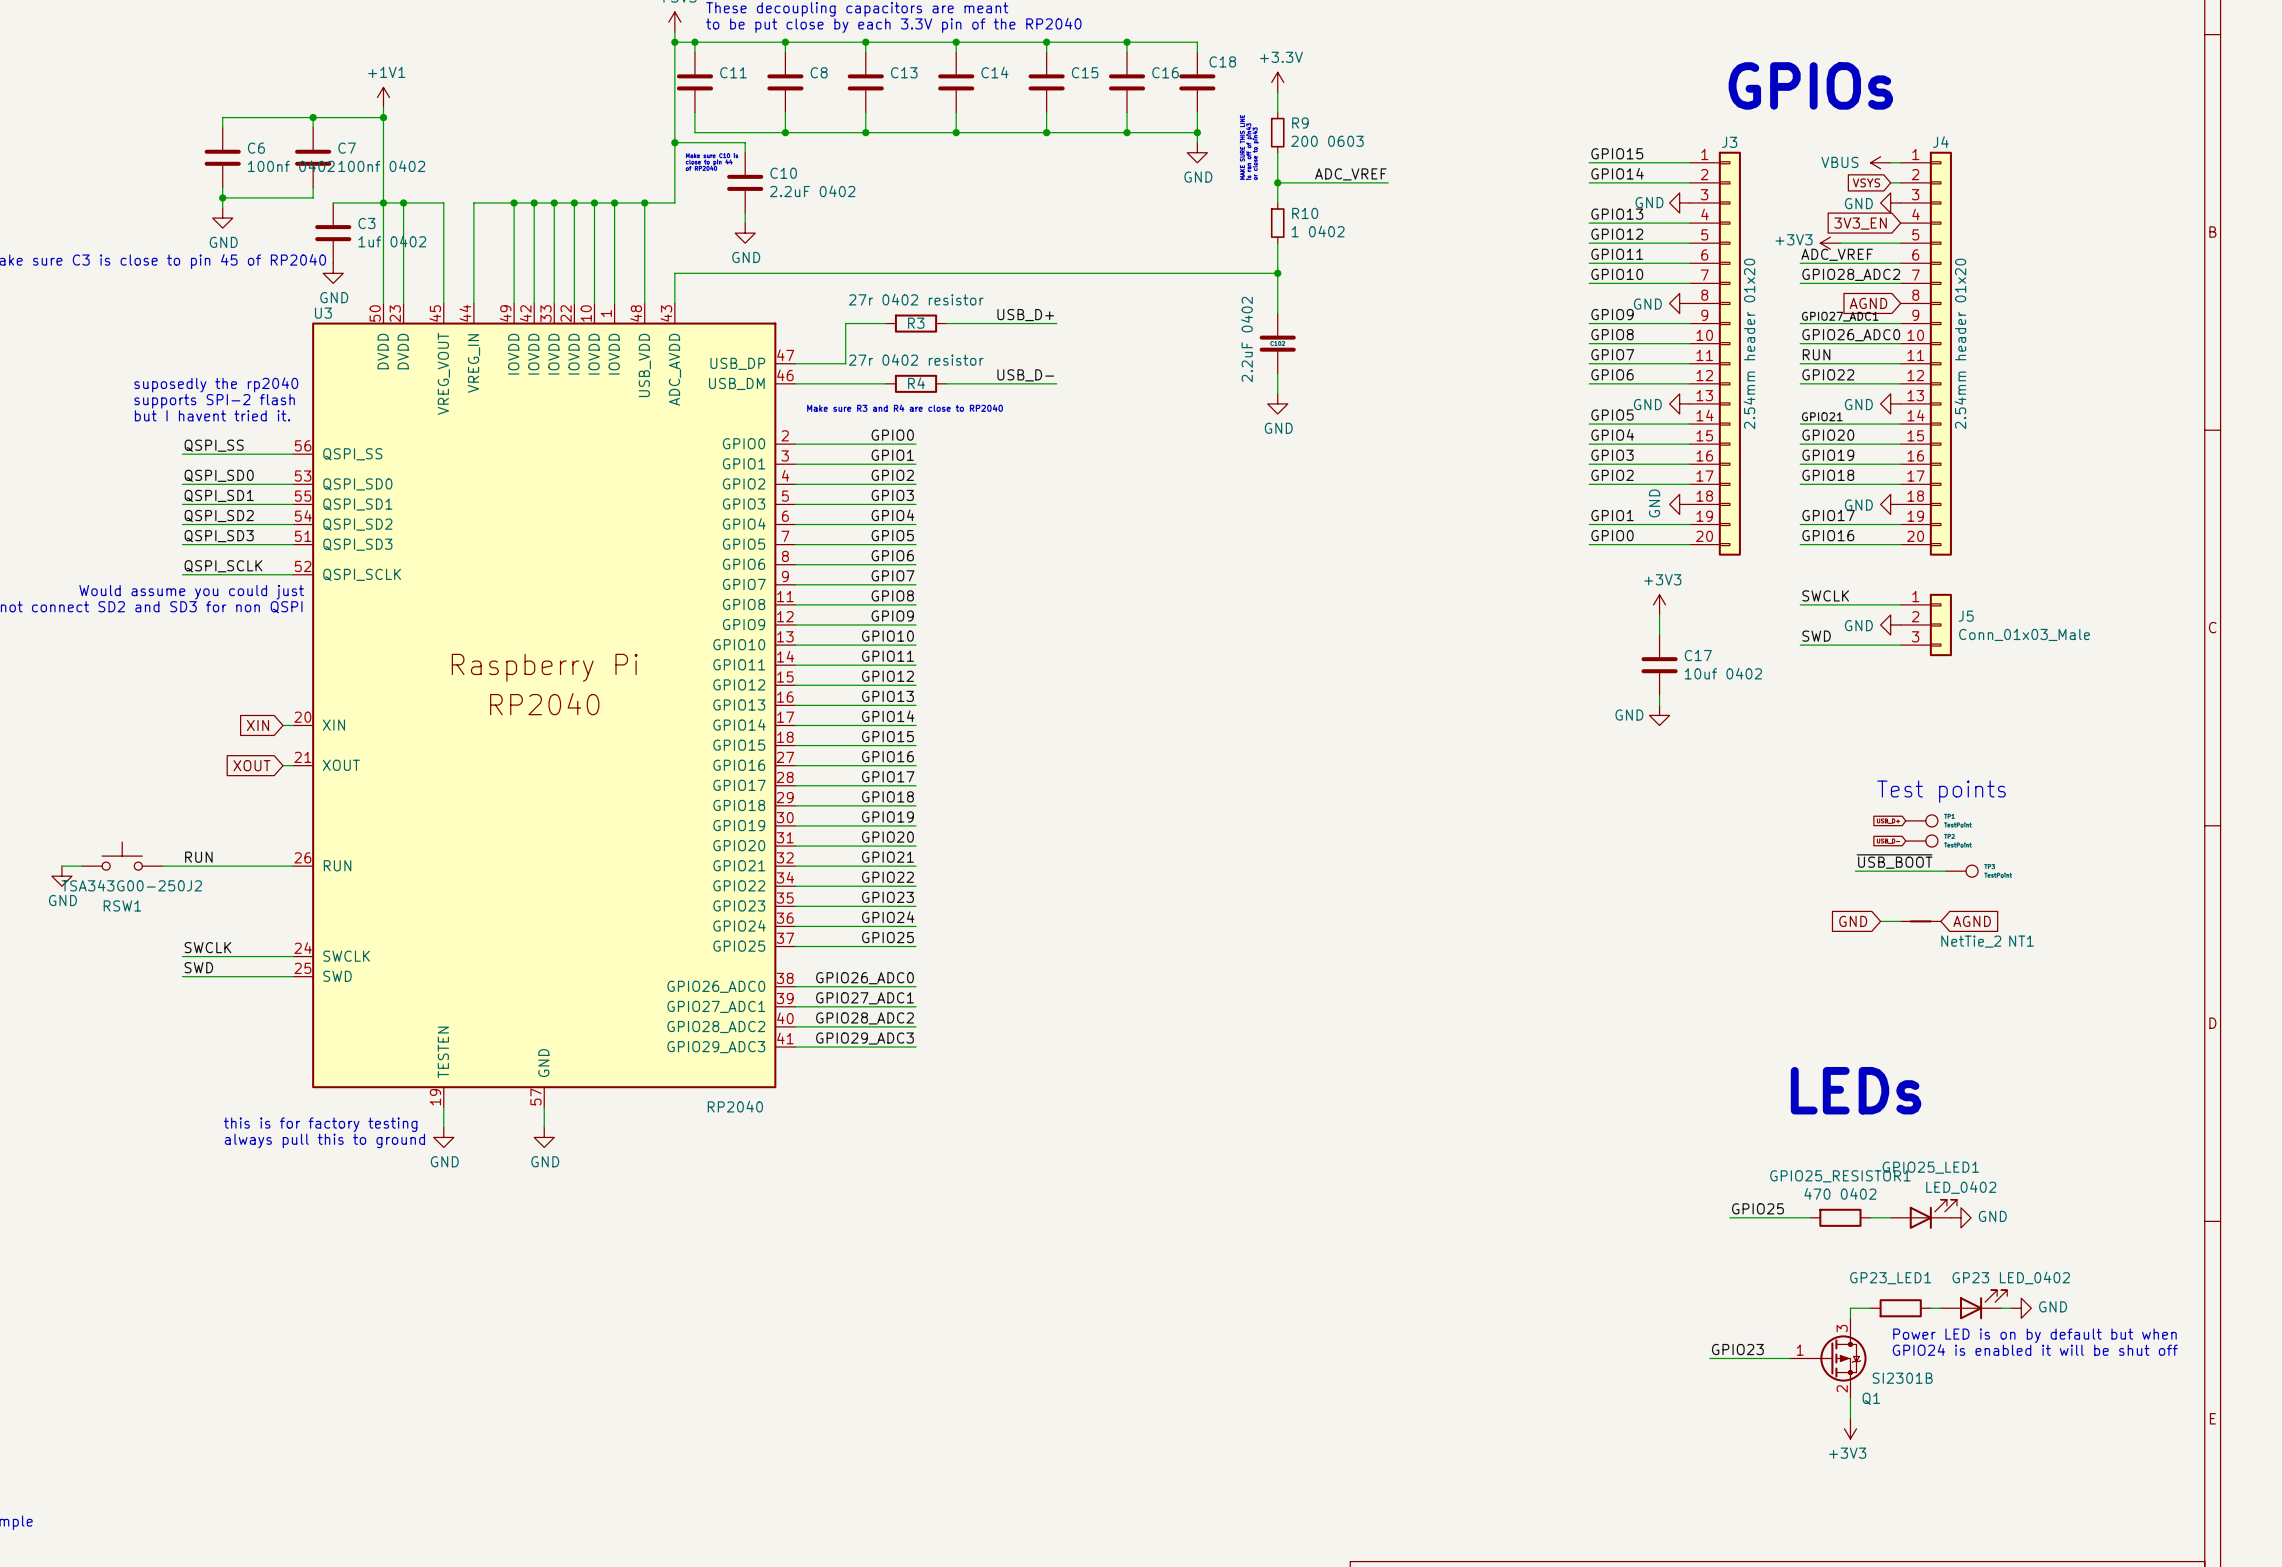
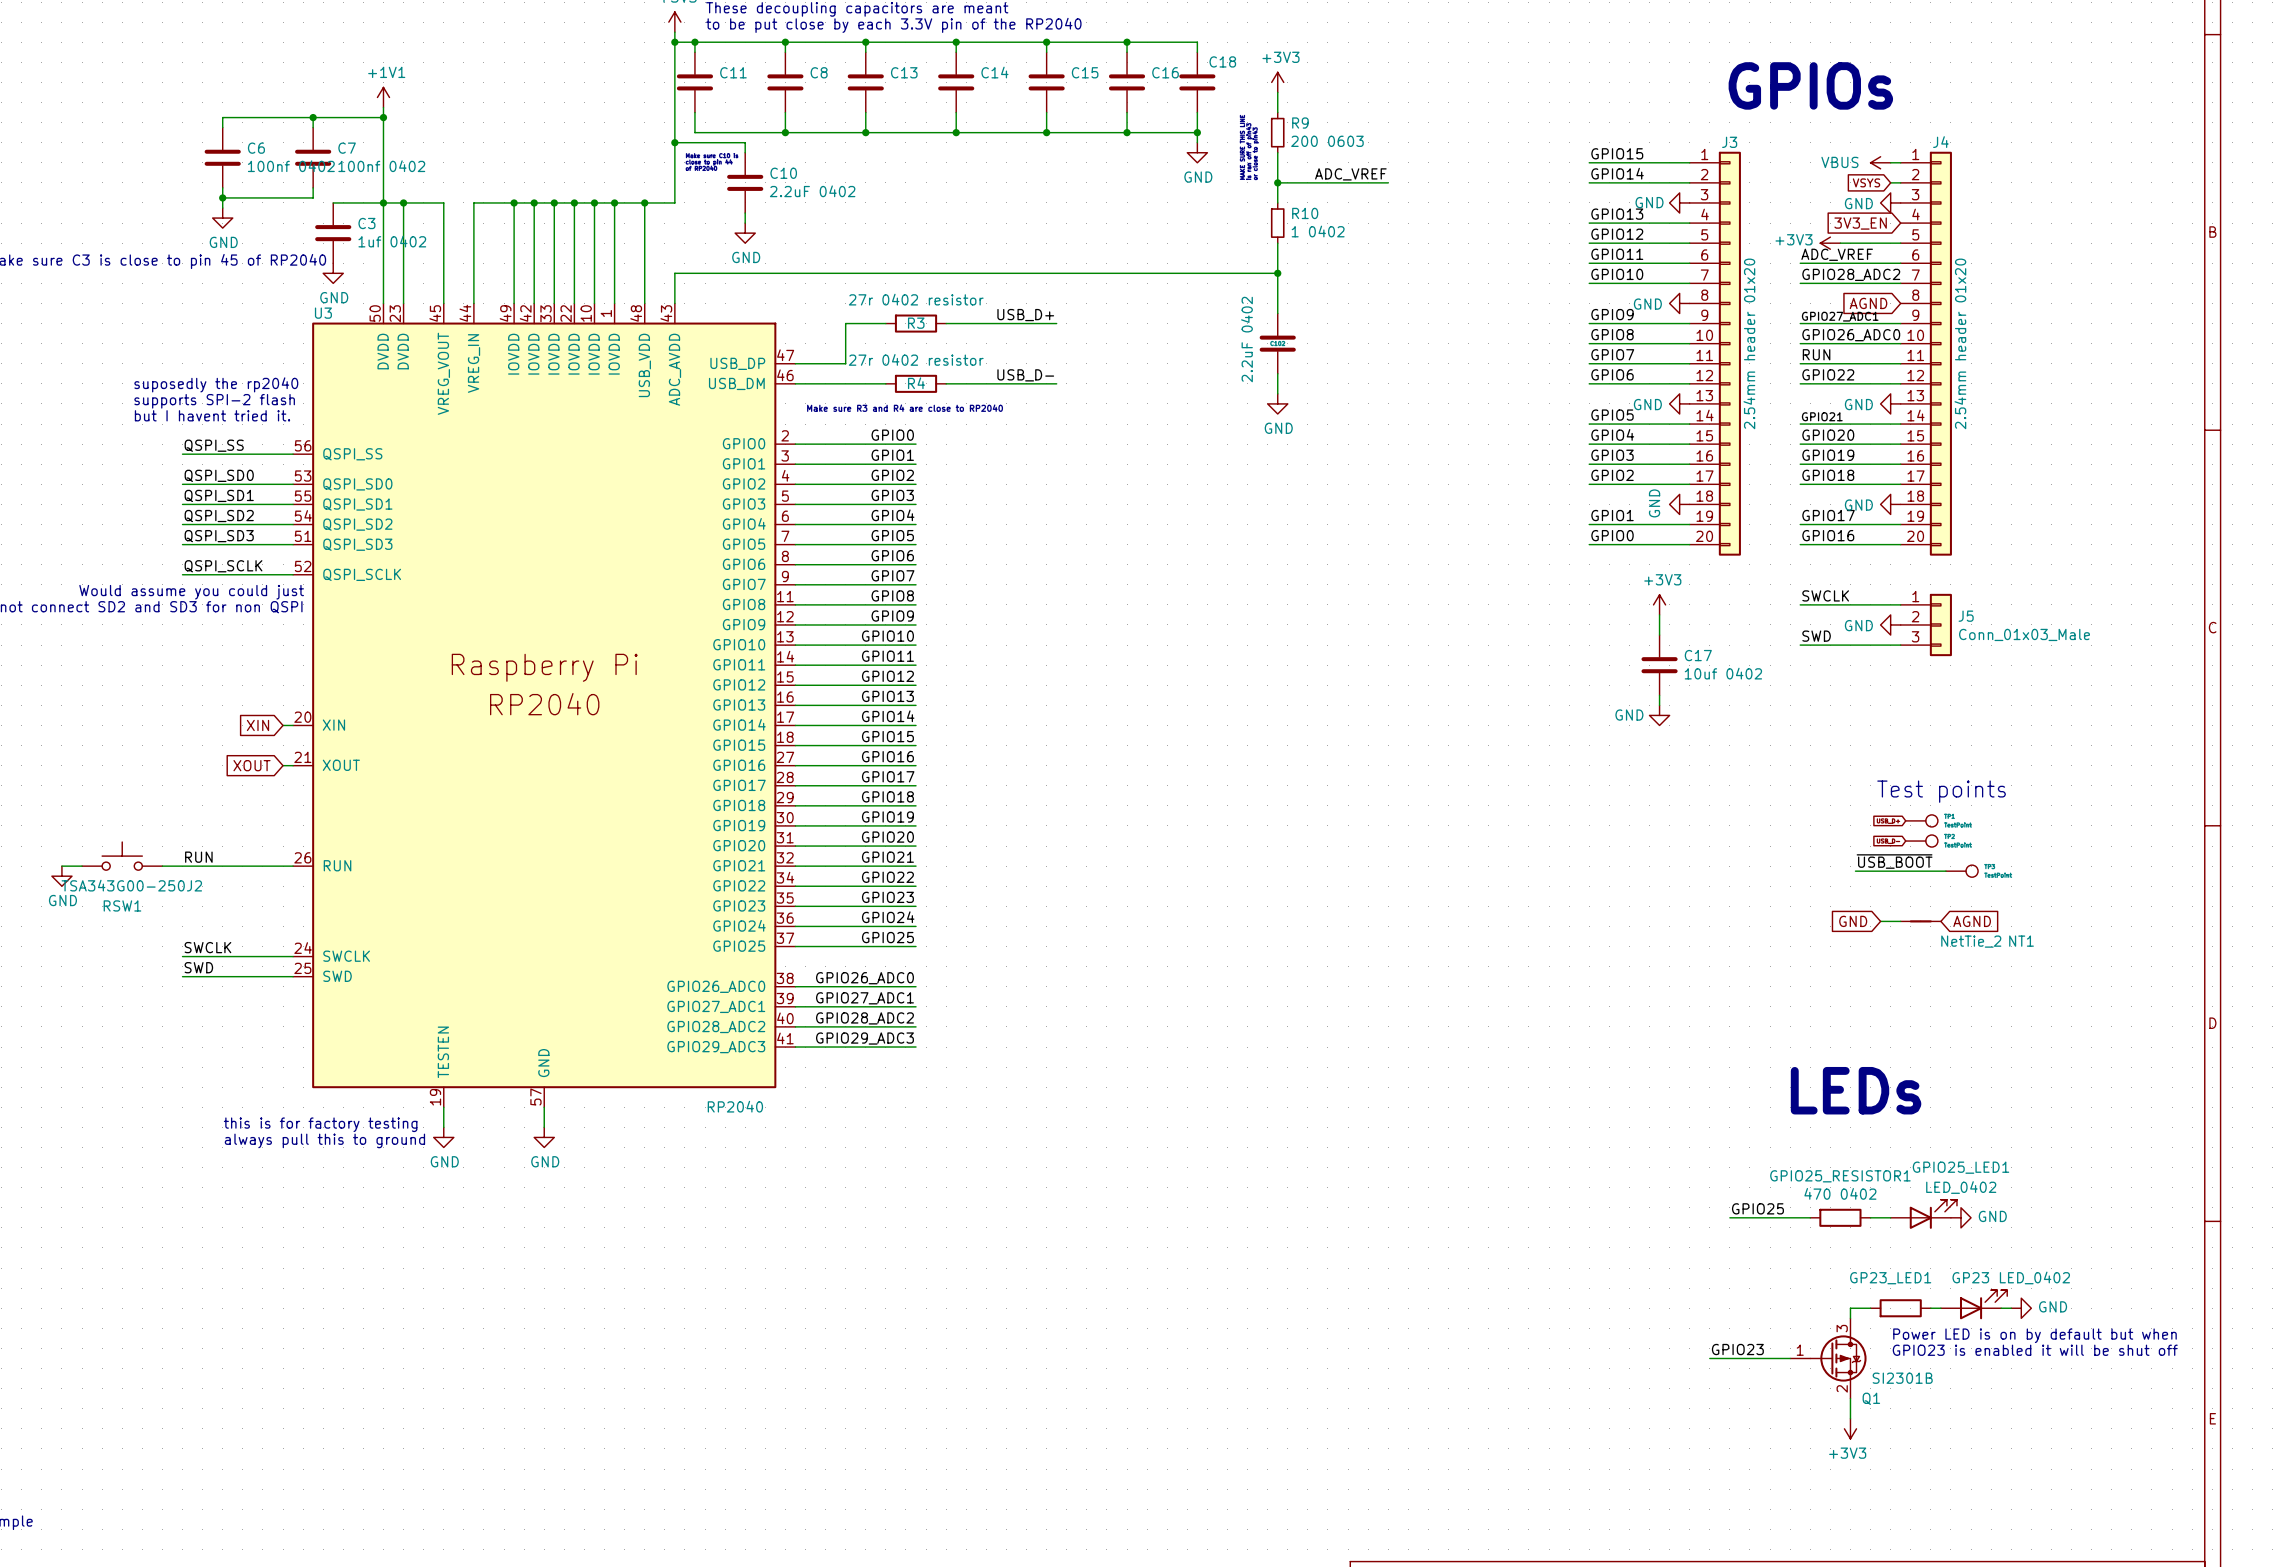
power symbol: +3.3V (1277, 82) -> +3V3 (1277, 82)
GPIO25_LED1 name position: GPIO25_LED1 (1930, 1167) -> GPIO25_LED1 (1960, 1167)
text: GPIO24 is enabled it will be shut off (2035, 1350) -> GPIO23 is enabled it will be shut off (2035, 1350)

